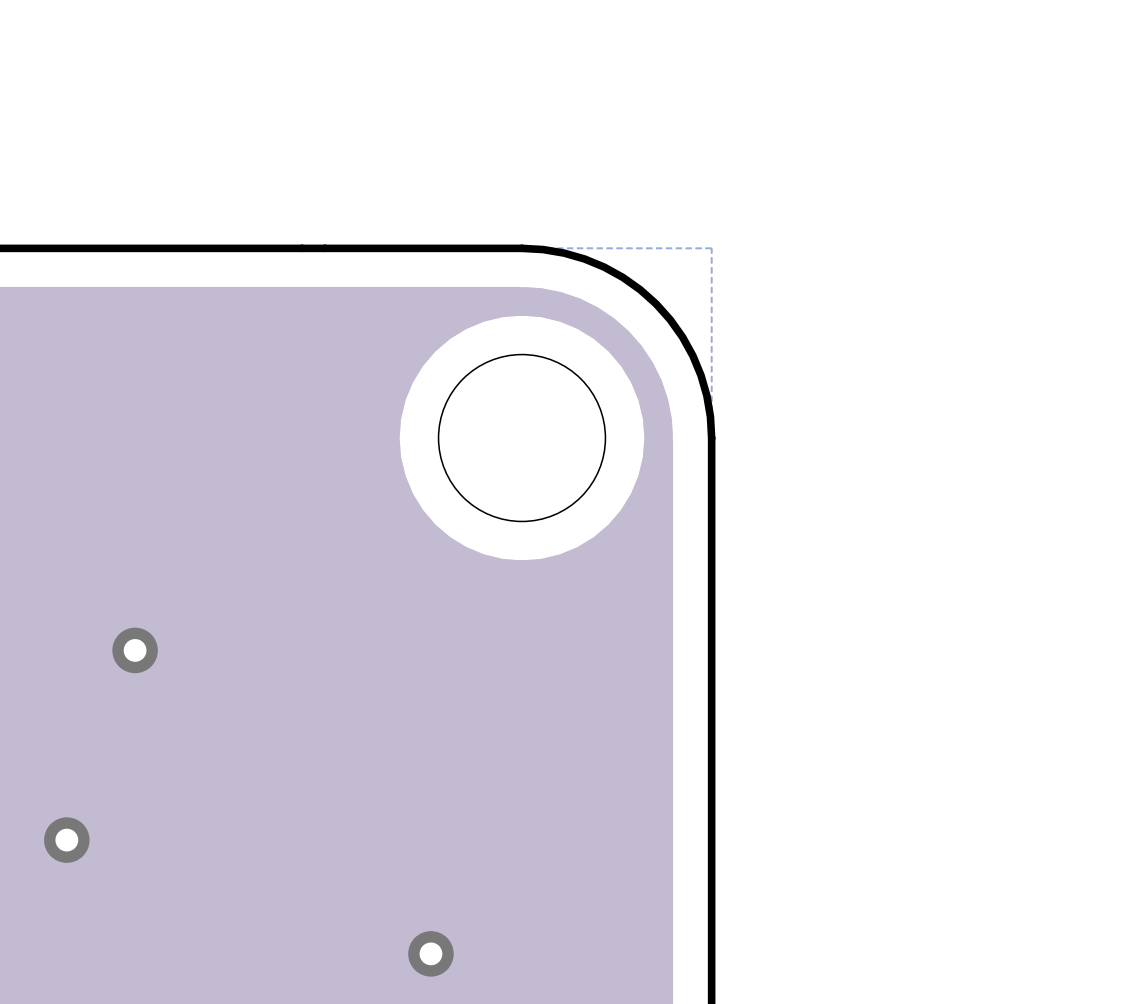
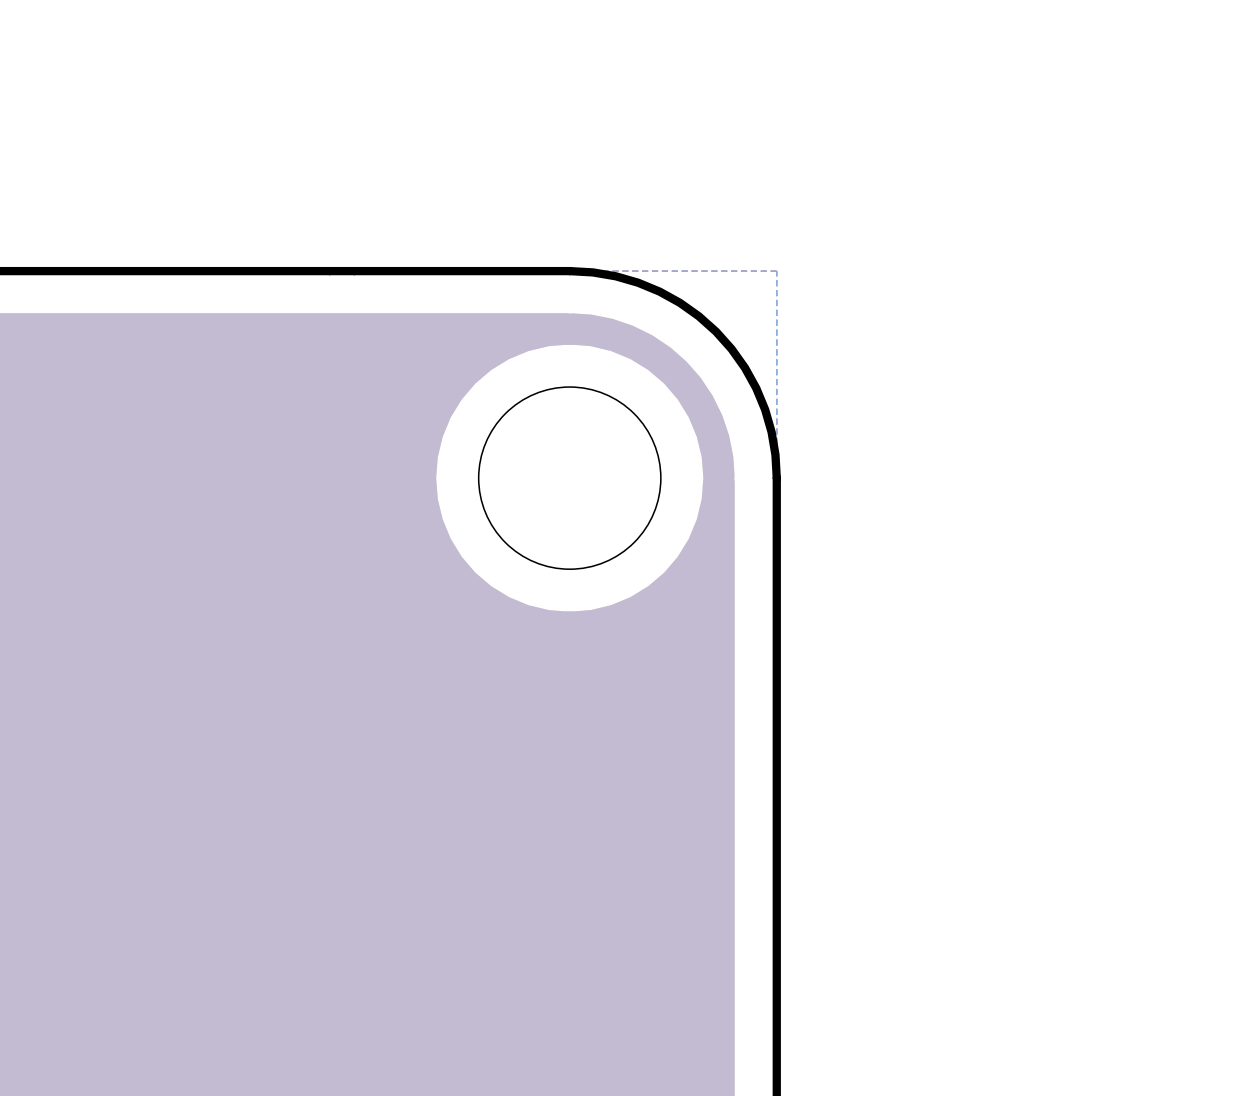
via: (135, 650) -> none
via: (66, 840) -> none
via: (430, 953) -> none

